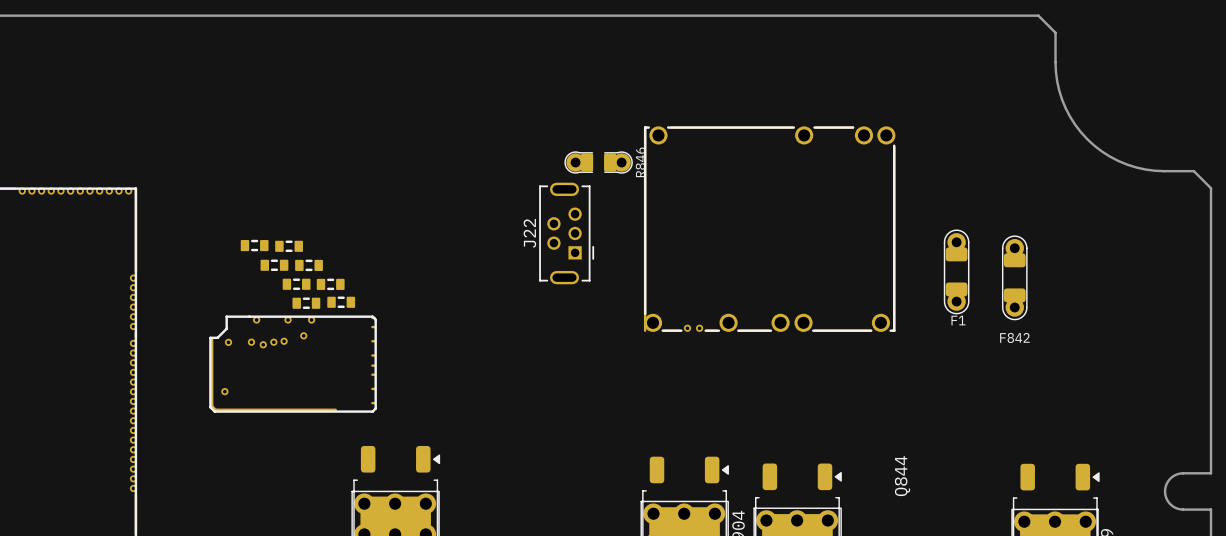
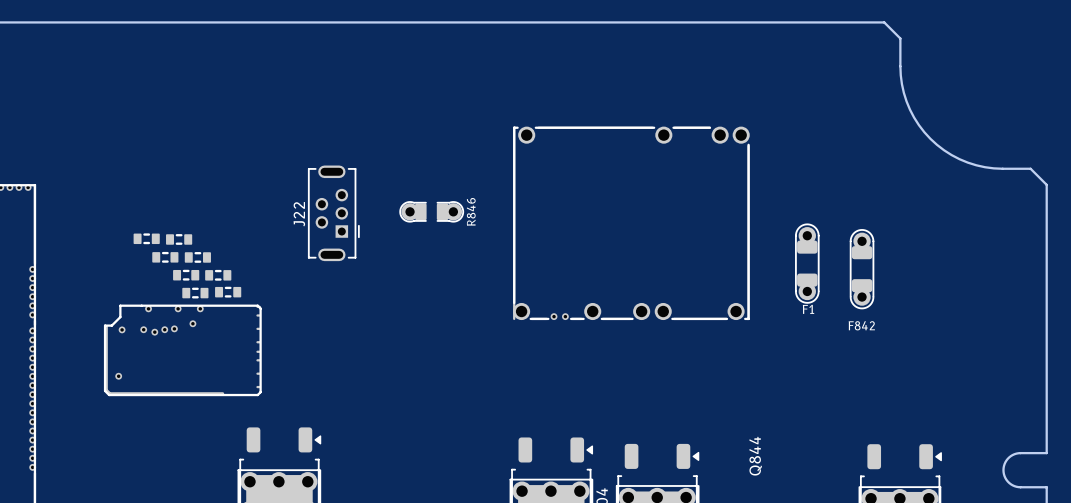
R846 position: (598, 162) -> (431, 211)
J22 position: (566, 233) -> (333, 213)

